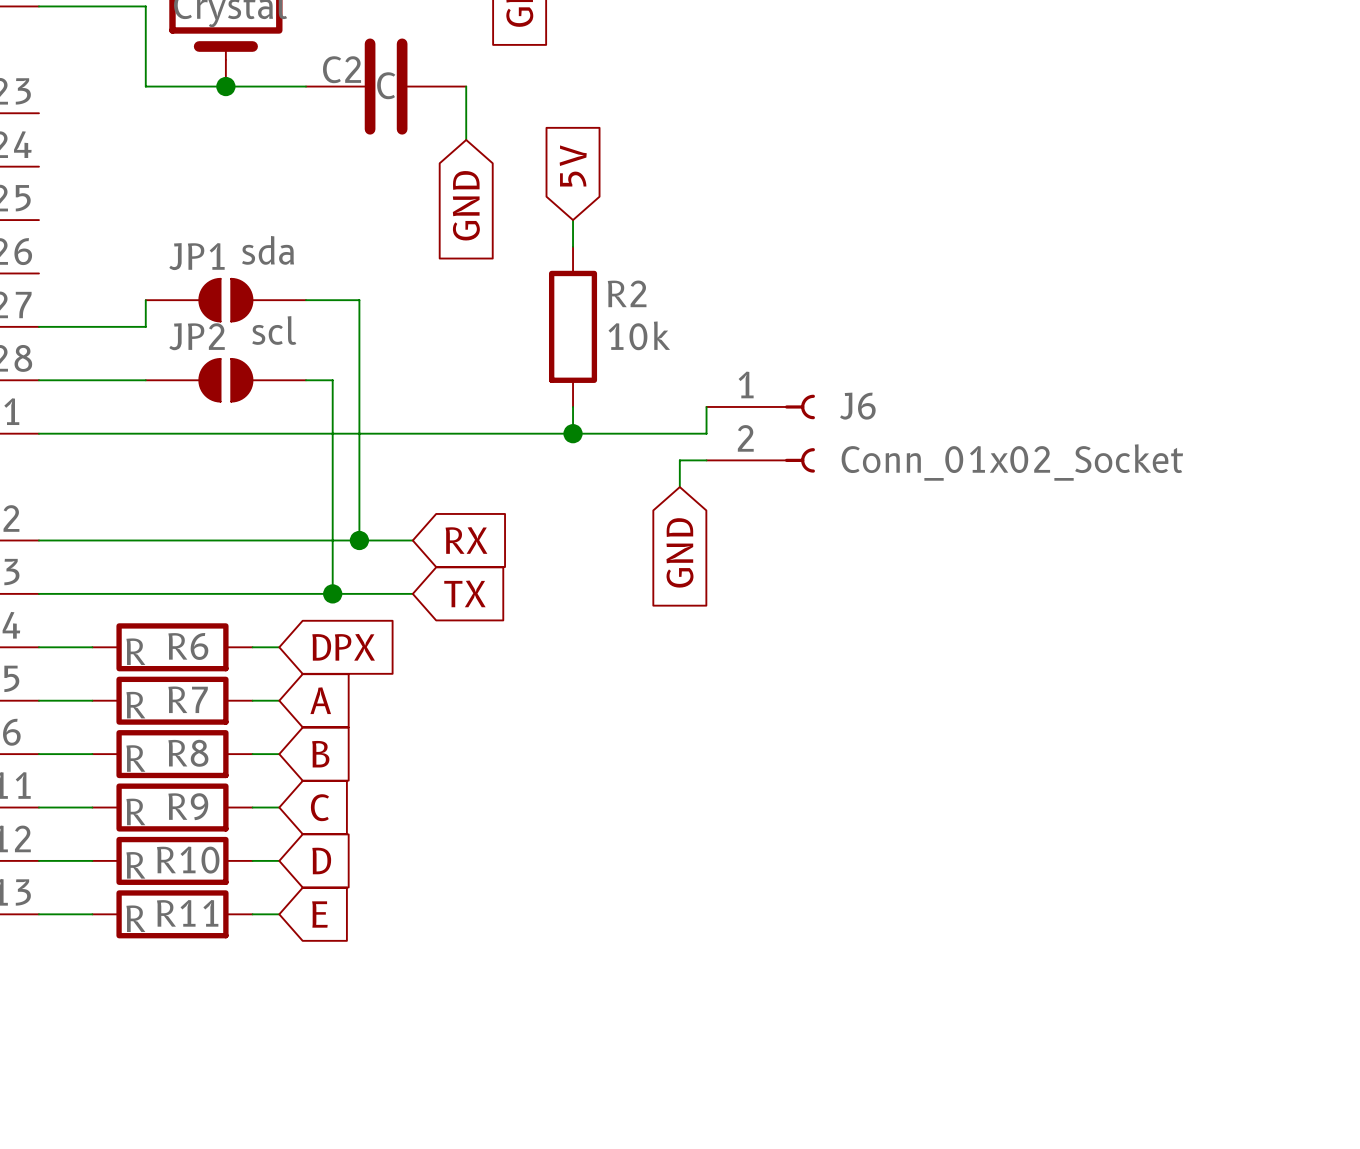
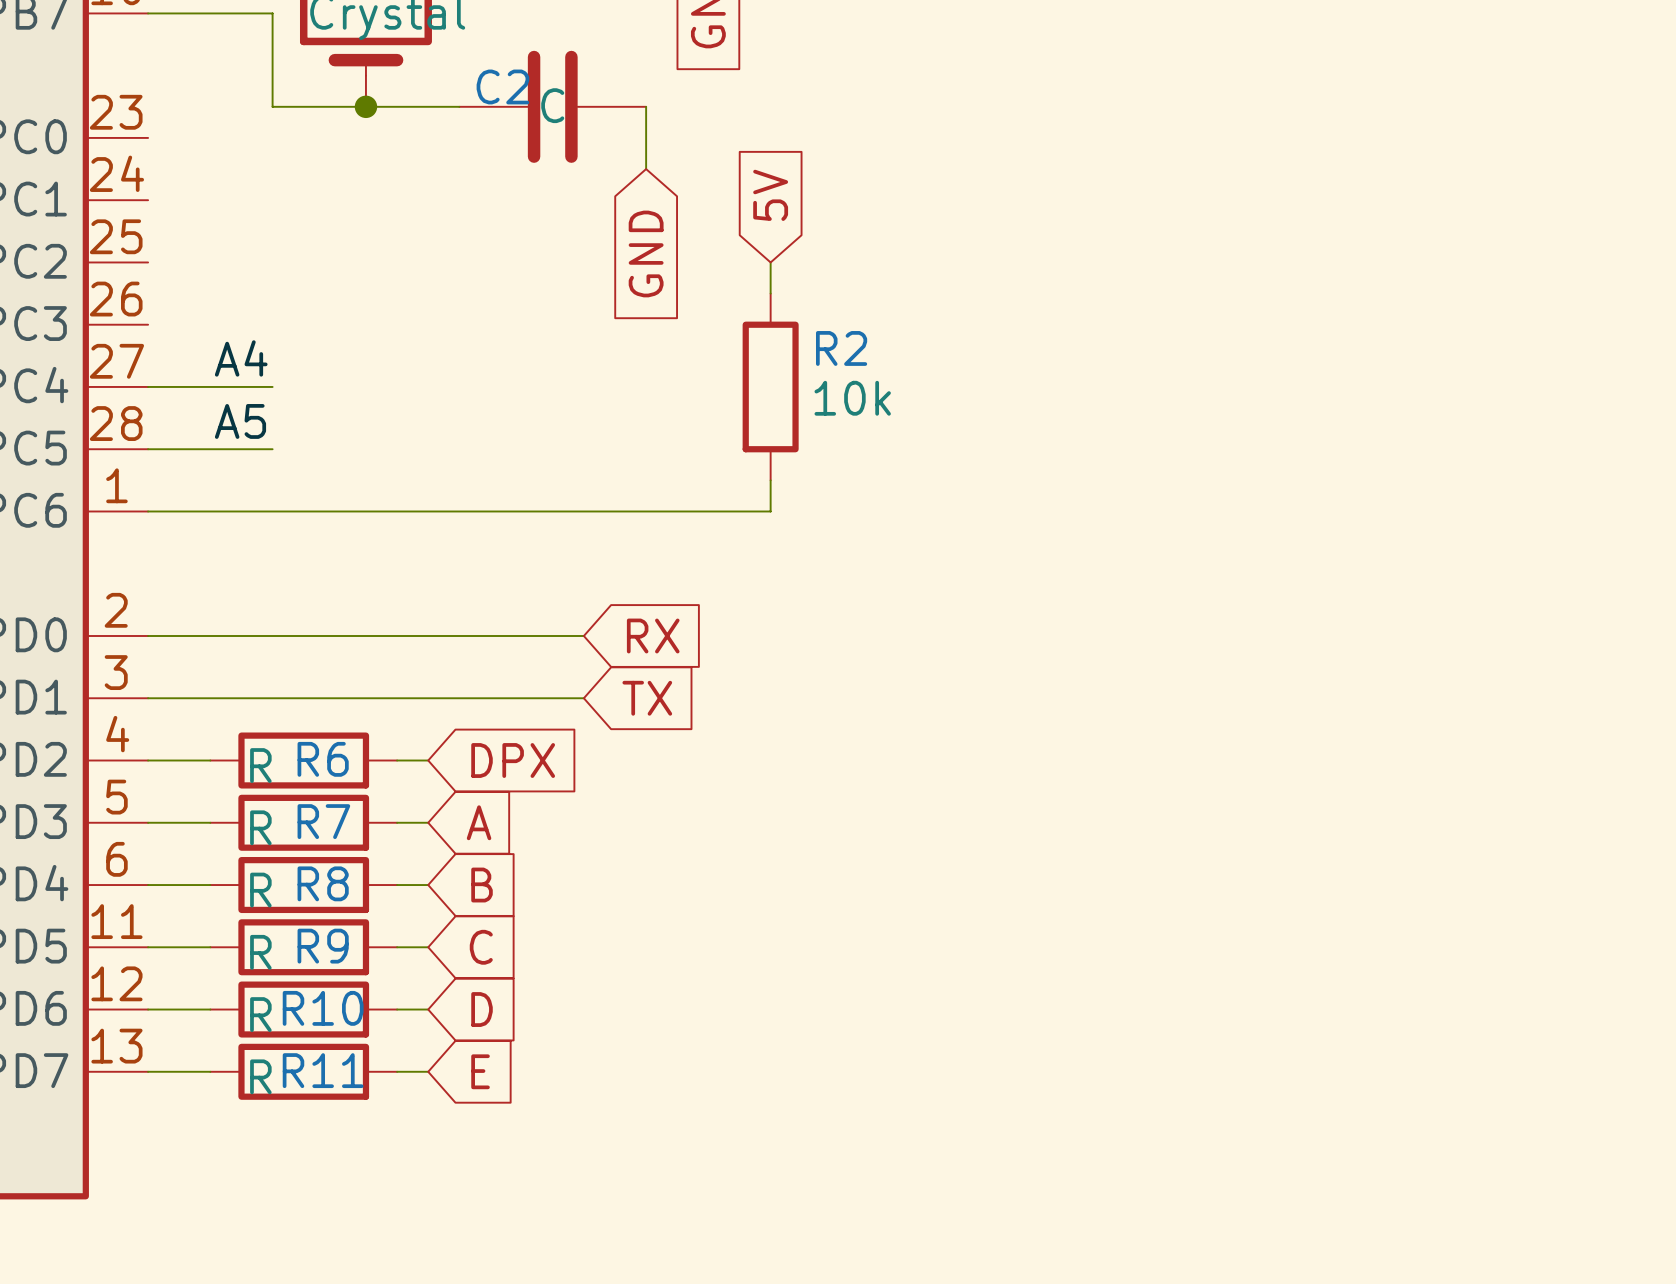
wire: (145, 300) (145, 326) -> none
JP1: sda (225, 300) -> none
wire: (306, 300) (359, 300) (359, 540) -> none
label: none -> A4 (241, 358)
label: none -> A5 (240, 421)
JP2: scl (225, 380) -> none
wire: (306, 380) (332, 380) (332, 593) -> none
wire: (706, 406) (706, 433) (573, 433) -> none
junction: (573, 433) -> none
J6: Conn_01x02_Socket (760, 433) -> none
wire: (706, 460) (679, 460) (679, 487) -> none
junction: (359, 540) -> none
global label: GND (679, 552) -> none
junction: (332, 593) -> none

